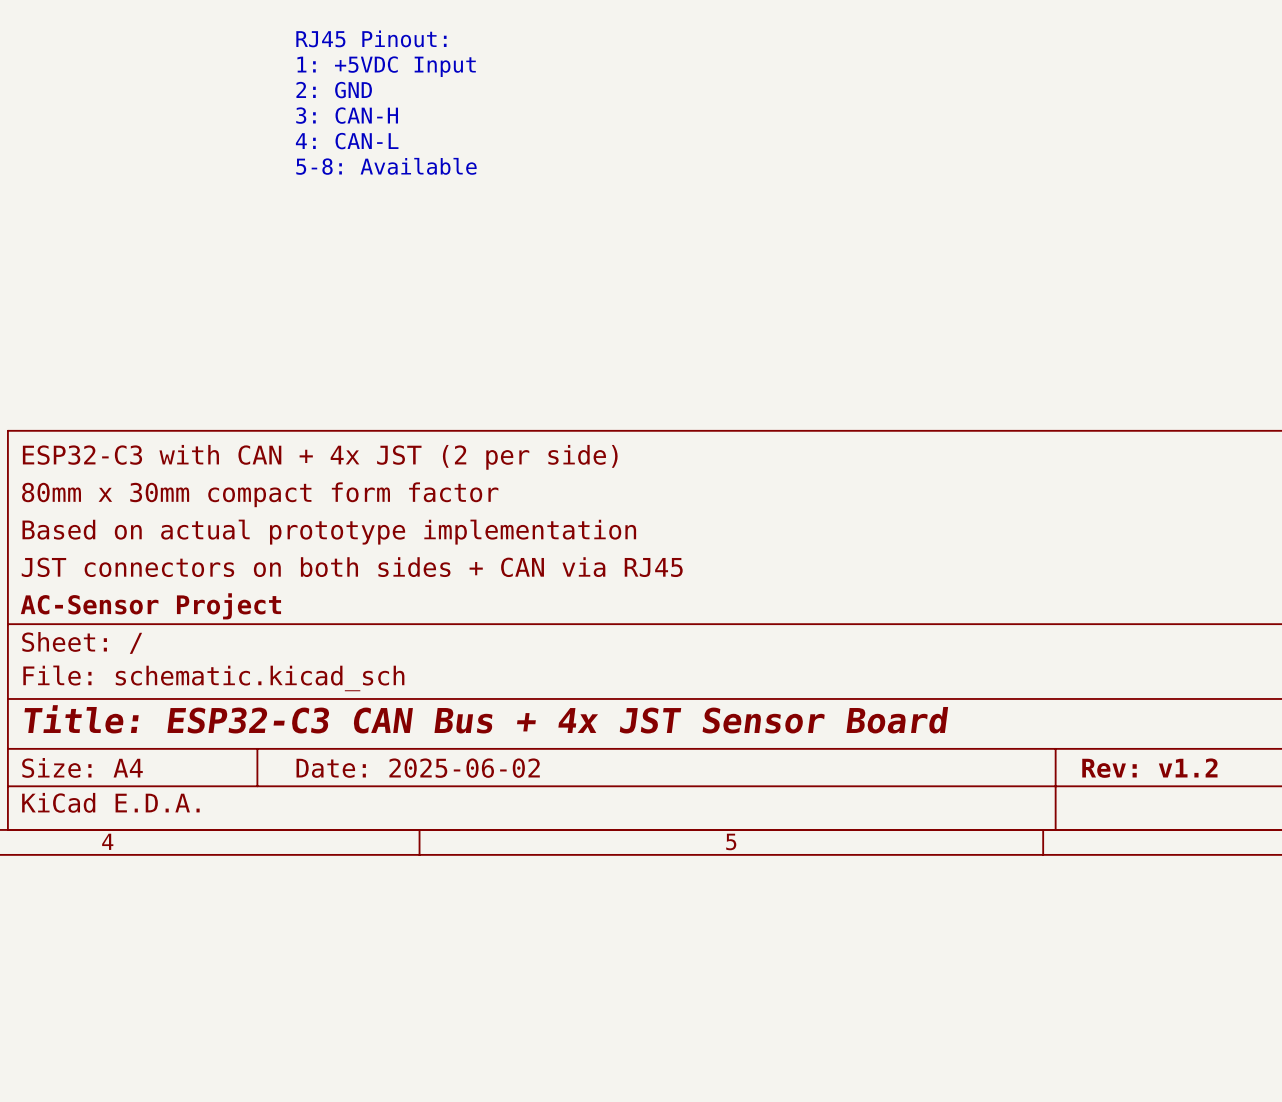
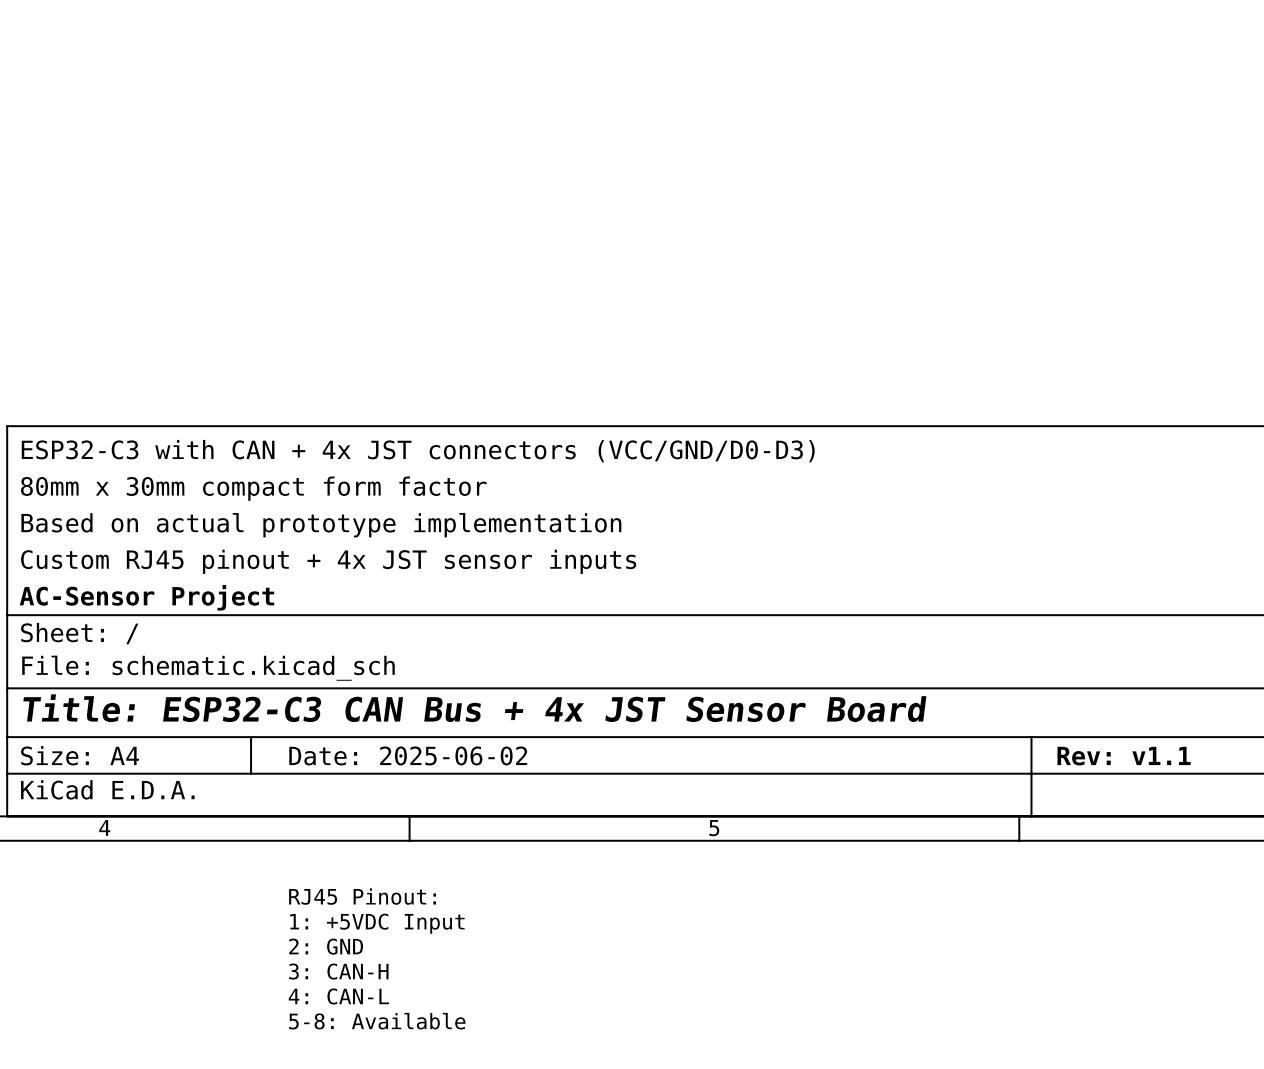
text: RJ45 Pinout: (371, 38) -> none
text: 1: +5VDC Input (386, 66) -> none
text: 2: GND (334, 90) -> none
text: 3: CAN-H (347, 115) -> none
text: 4: CAN-L (347, 141) -> none
text: 5-8: Available (386, 166) -> none
title block: ESP32-C3 with CAN + 4x JST (2 per side) (320, 457) -> ESP32-C3 with CAN + 4x JST connectors (VCC/GND/D0-D3) (418, 451)
title block: JST connectors on both sides + CAN via RJ45 (352, 567) -> Custom RJ45 pinout + 4x JST sensor inputs (328, 561)
title block: Rev: v1.2 (1149, 768) -> Rev: v1.1 (1124, 756)
text: none -> RJ45 Pinout: (362, 896)
text: none -> 1: +5VDC Input (377, 923)
text: none -> 2: GND (326, 946)
text: none -> 3: CAN-H (338, 971)
text: none -> 4: CAN-L (338, 996)
text: none -> 5-8: Available (377, 1021)

